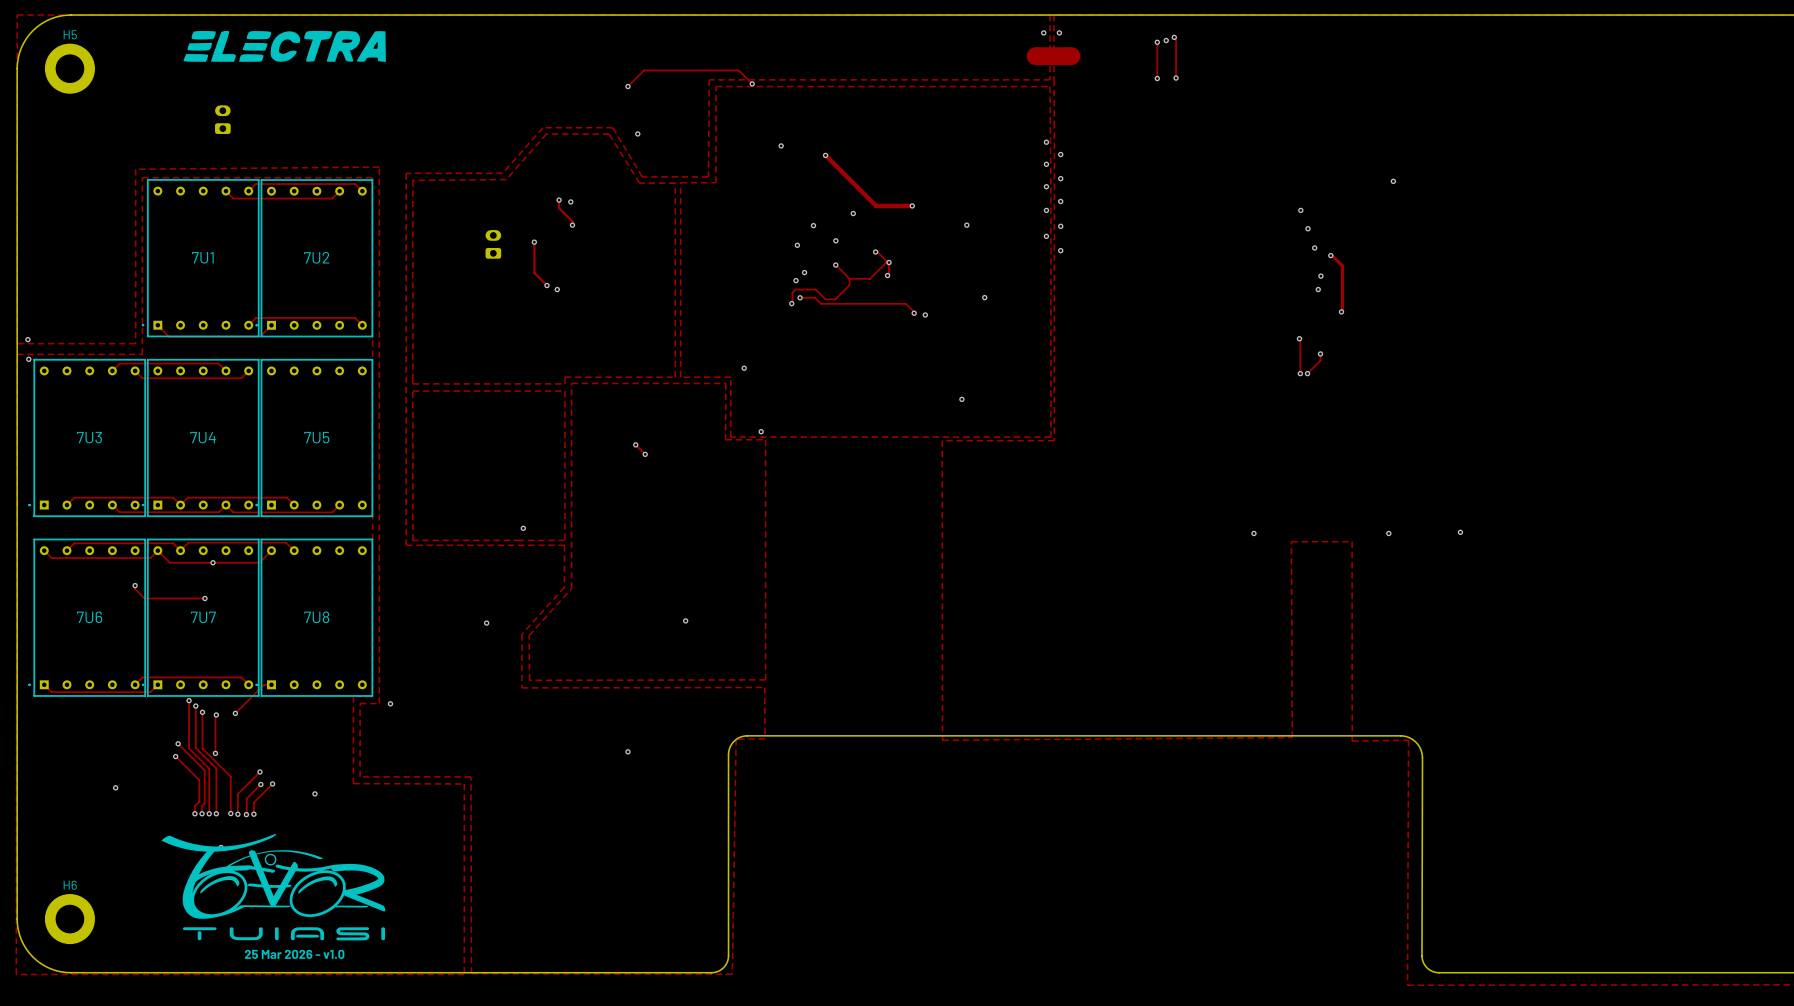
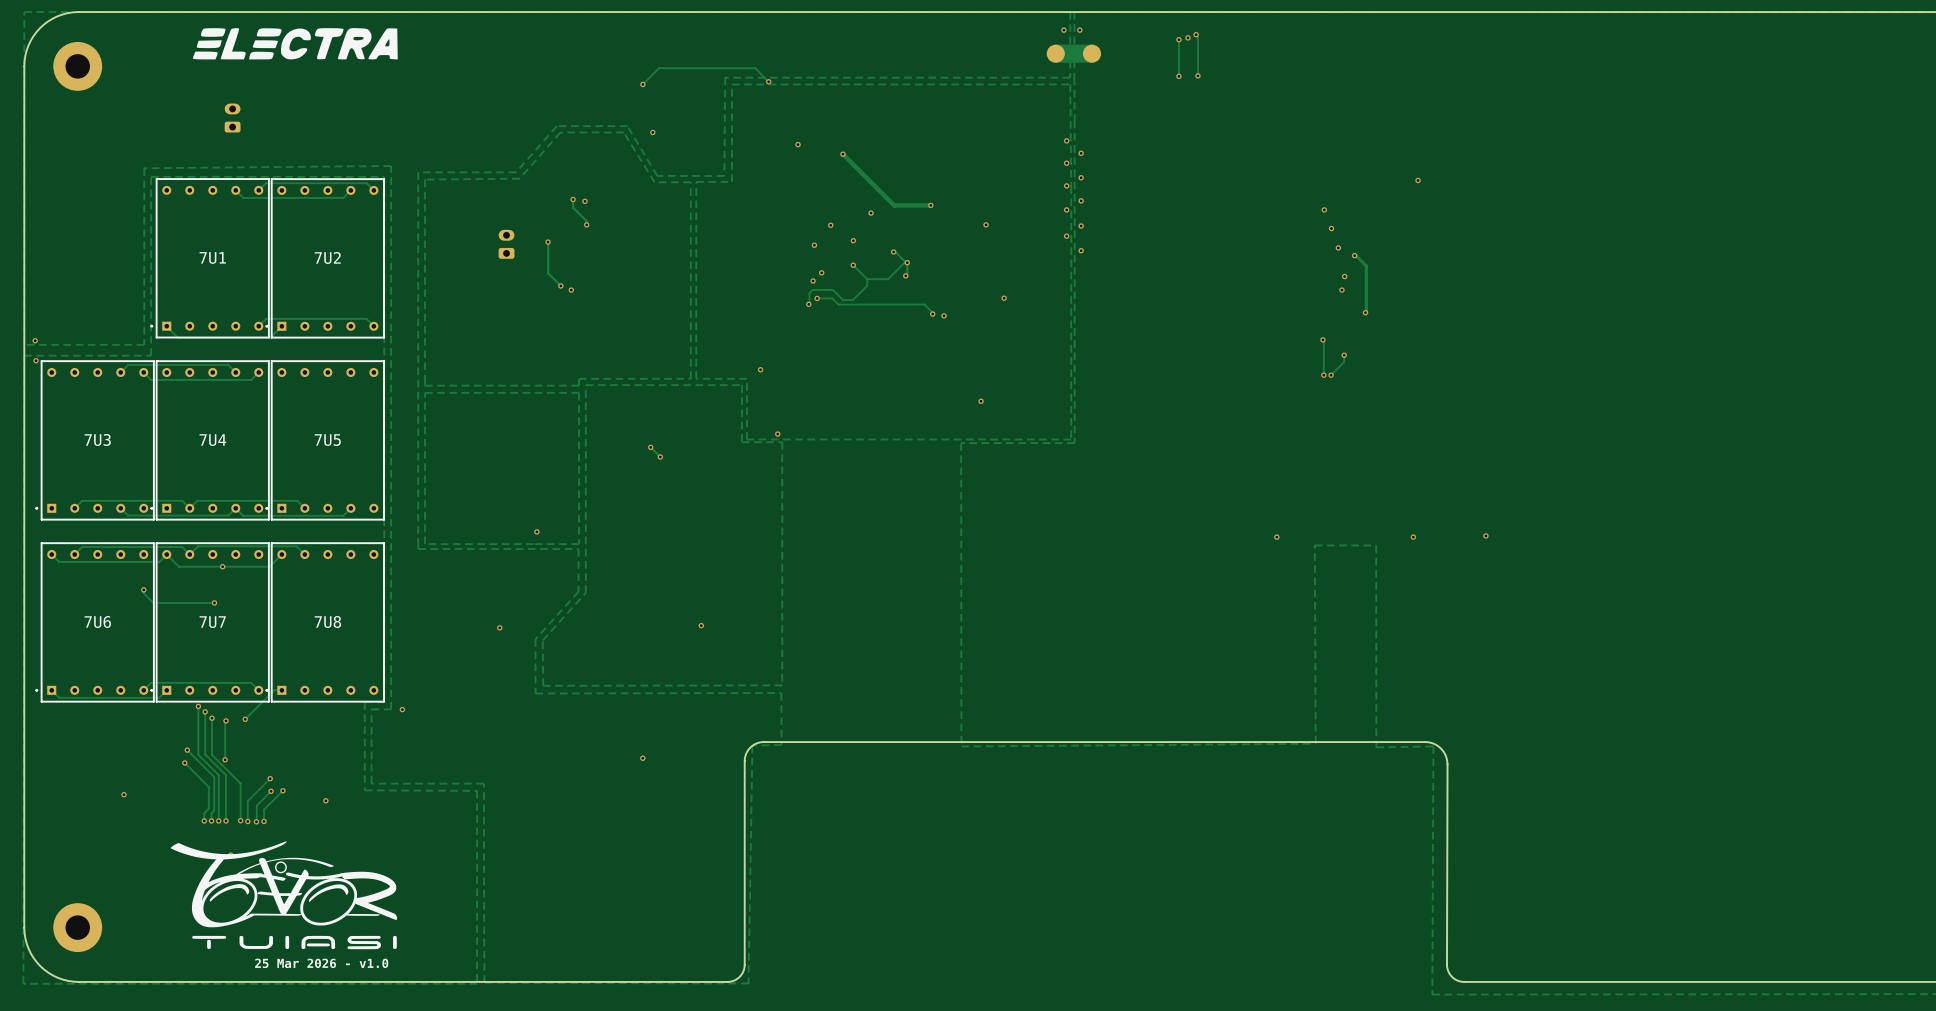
H5: (69, 68) -> none
part: none -> (77, 66)
H6: (69, 919) -> none
part: none -> (77, 927)

